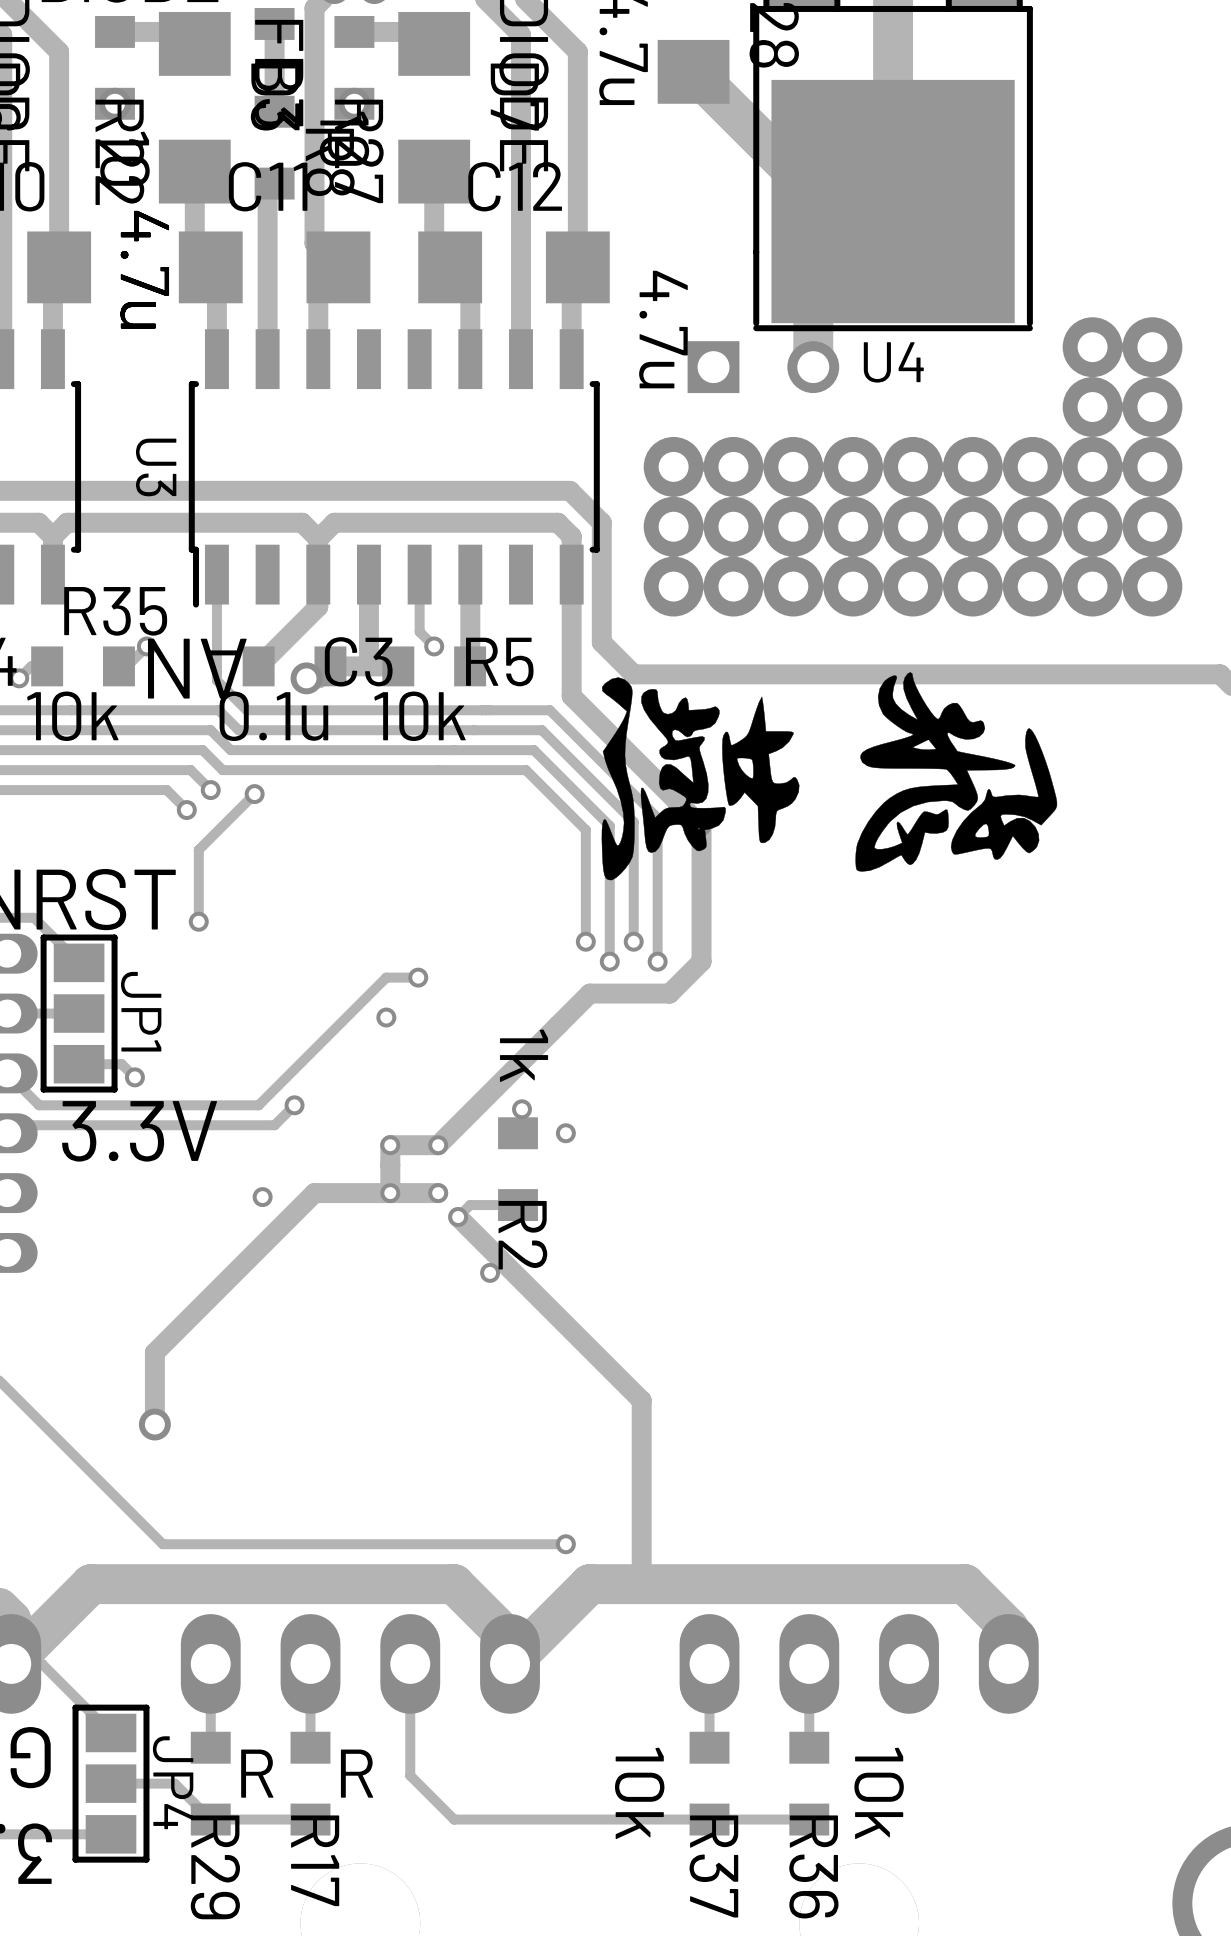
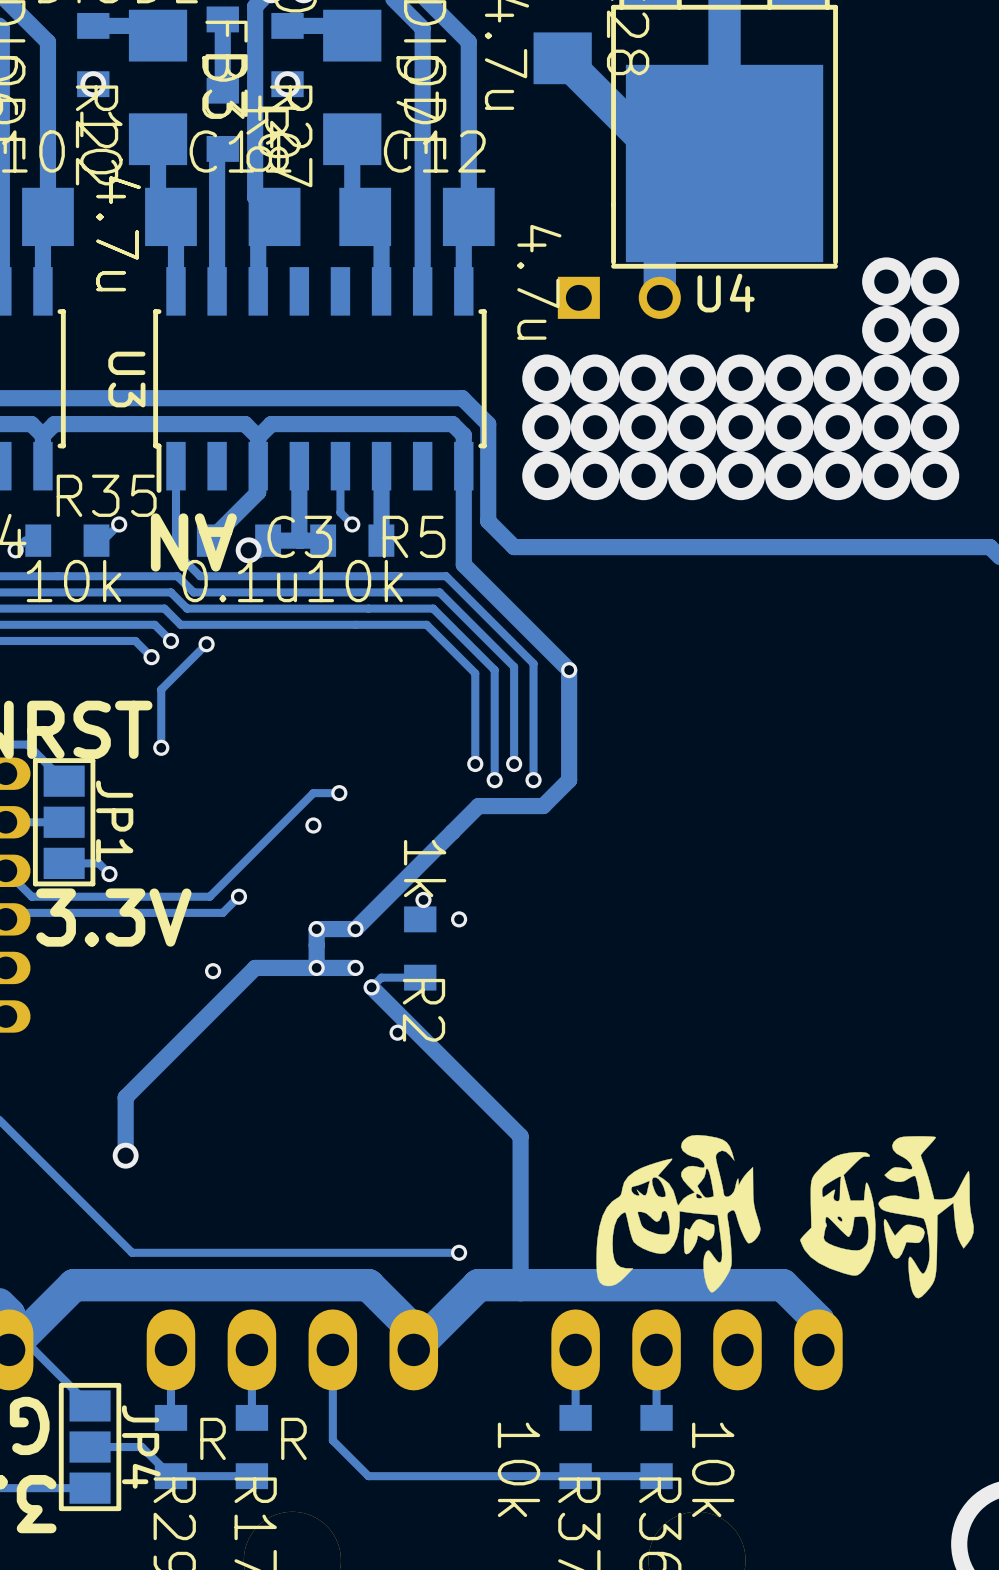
text position: AN (197, 668) -> AN (193, 542)
drawing: [601, 672, 1058, 881] -> none
drawing: none -> [596, 1134, 974, 1299]

